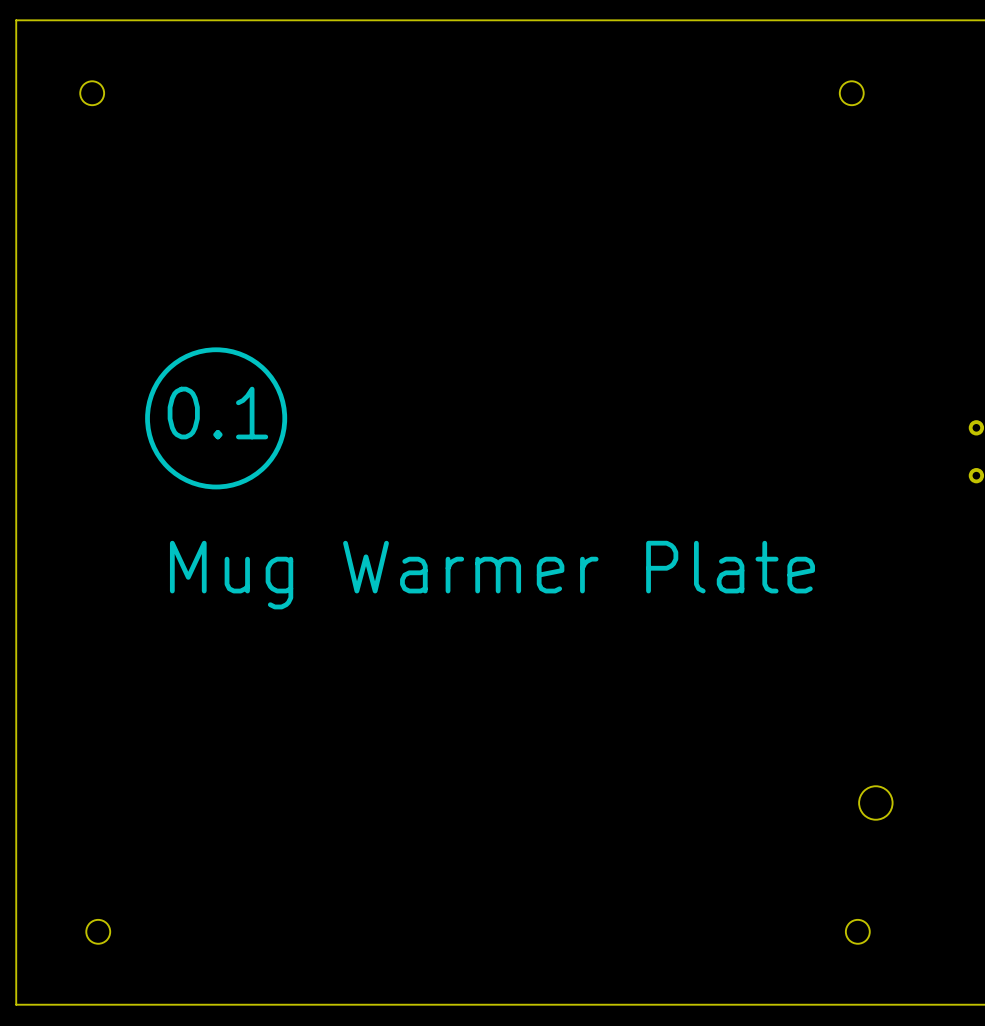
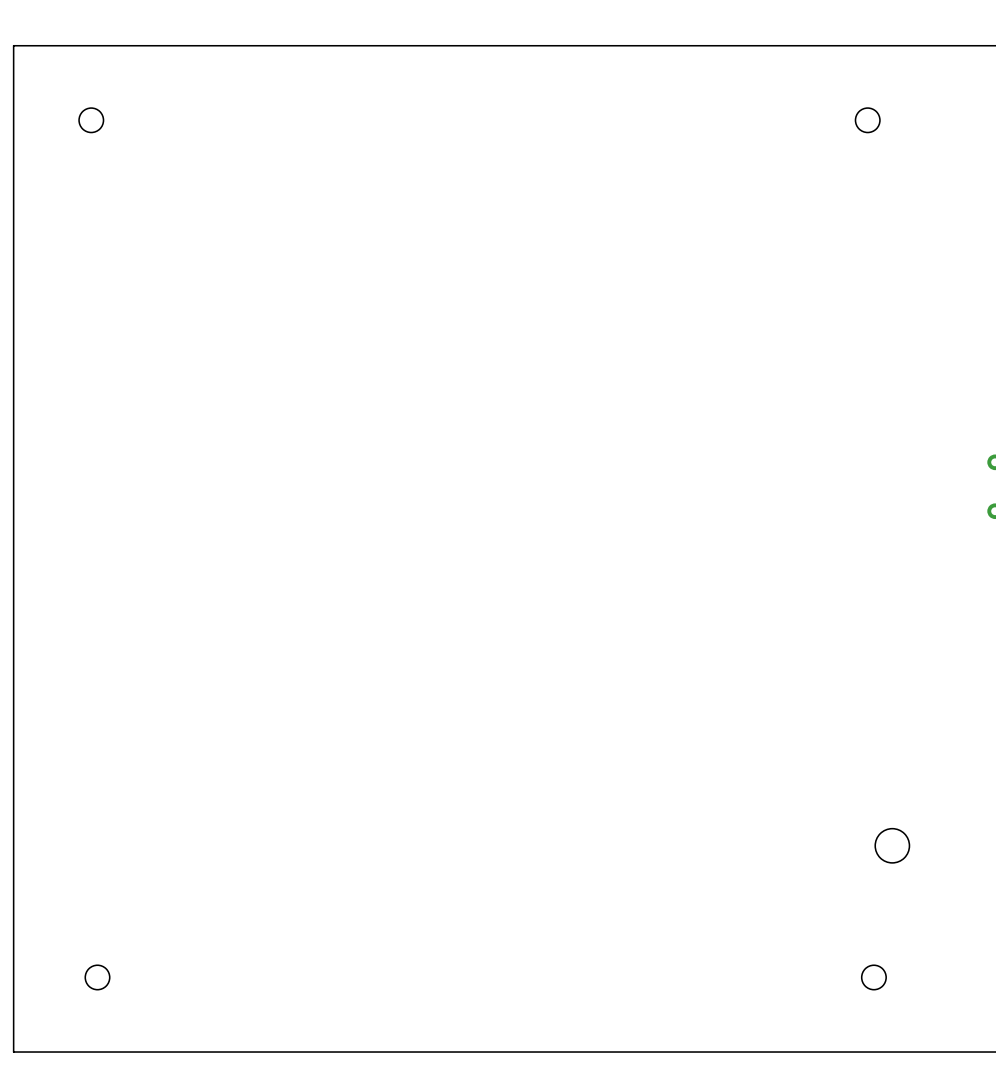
drawing: [145, 347, 288, 490] -> none
text: 0.1 (217, 413) -> none
text: Mug Warmer Plate (492, 575) -> none

